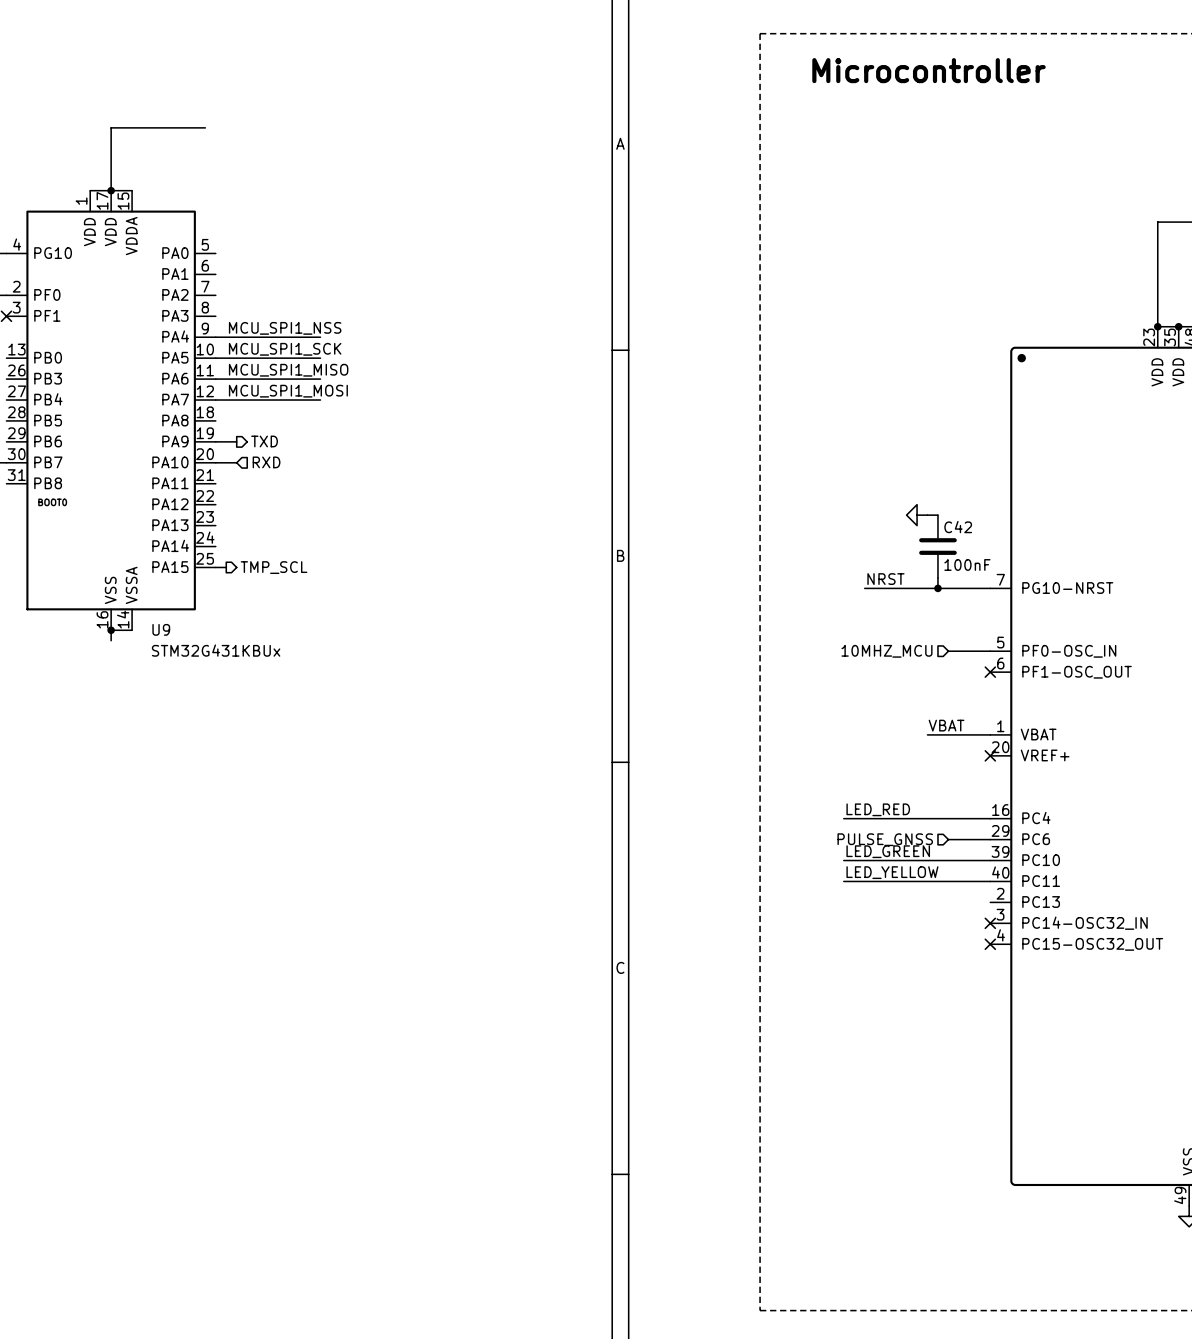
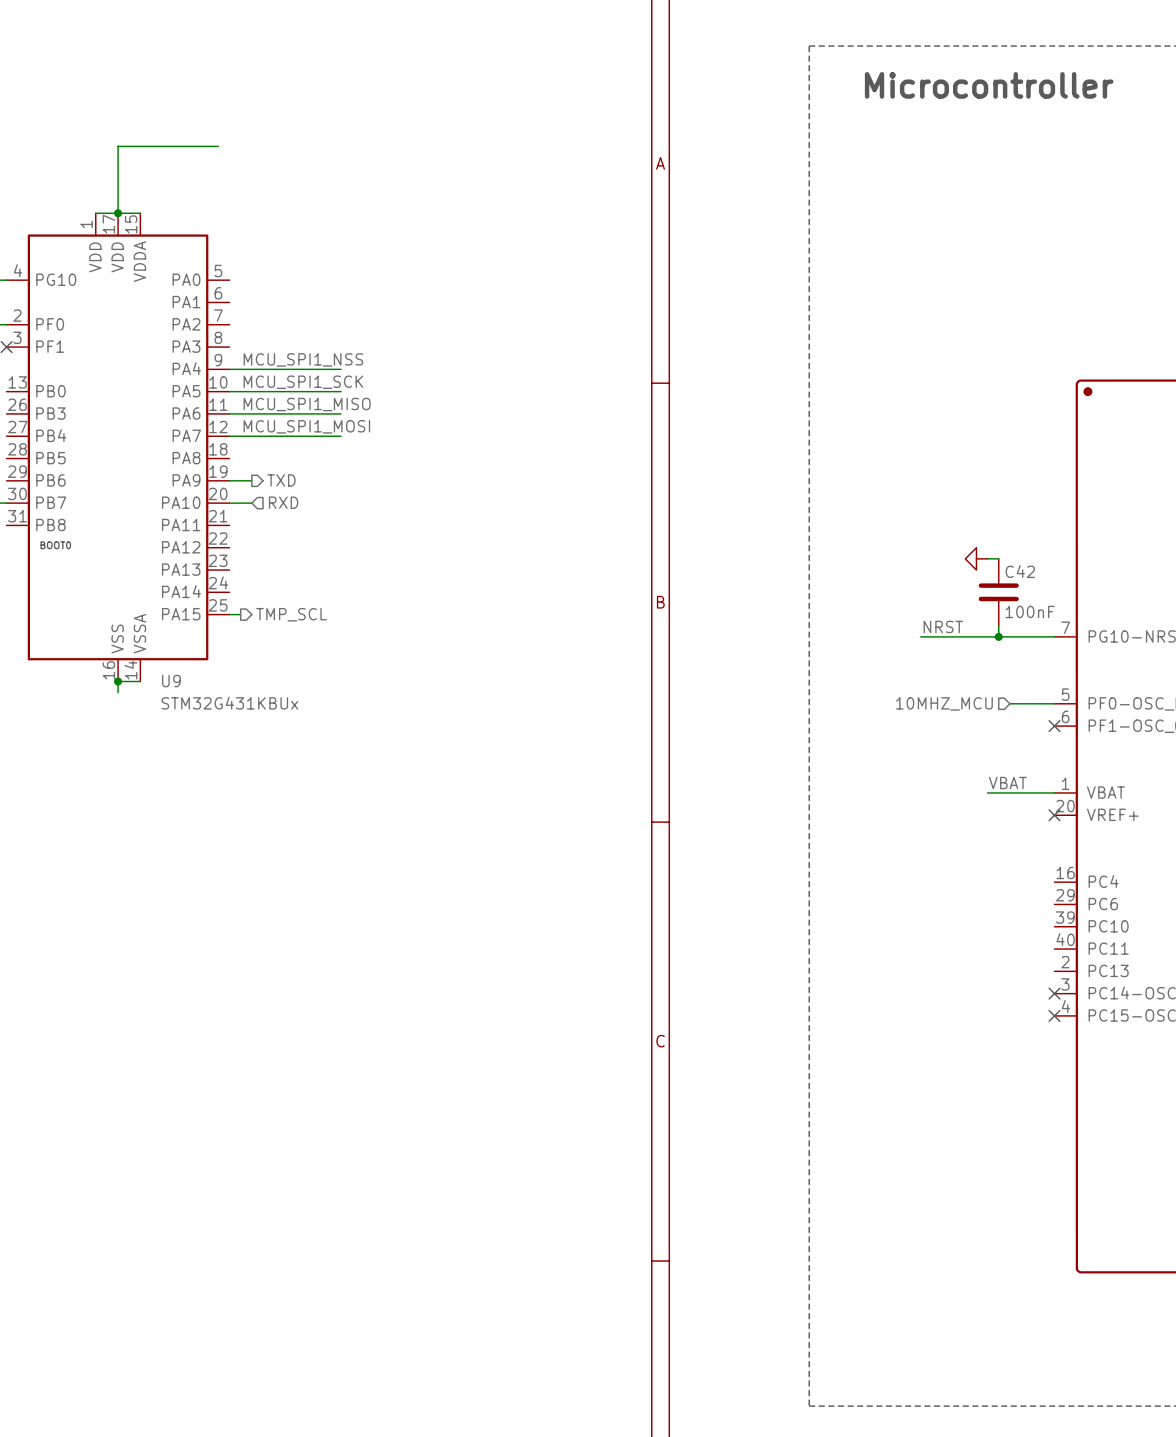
label: LED_RED (878, 809) -> none
wire: (843, 818) (990, 818) -> none
hierarchical label: PULSE_GNSS (885, 839) -> none
wire: (948, 839) (990, 839) -> none
label: LED_GREEN (888, 851) -> none
wire: (843, 860) (990, 860) -> none
label: LED_YELLOW (892, 872) -> none
wire: (843, 881) (990, 881) -> none

